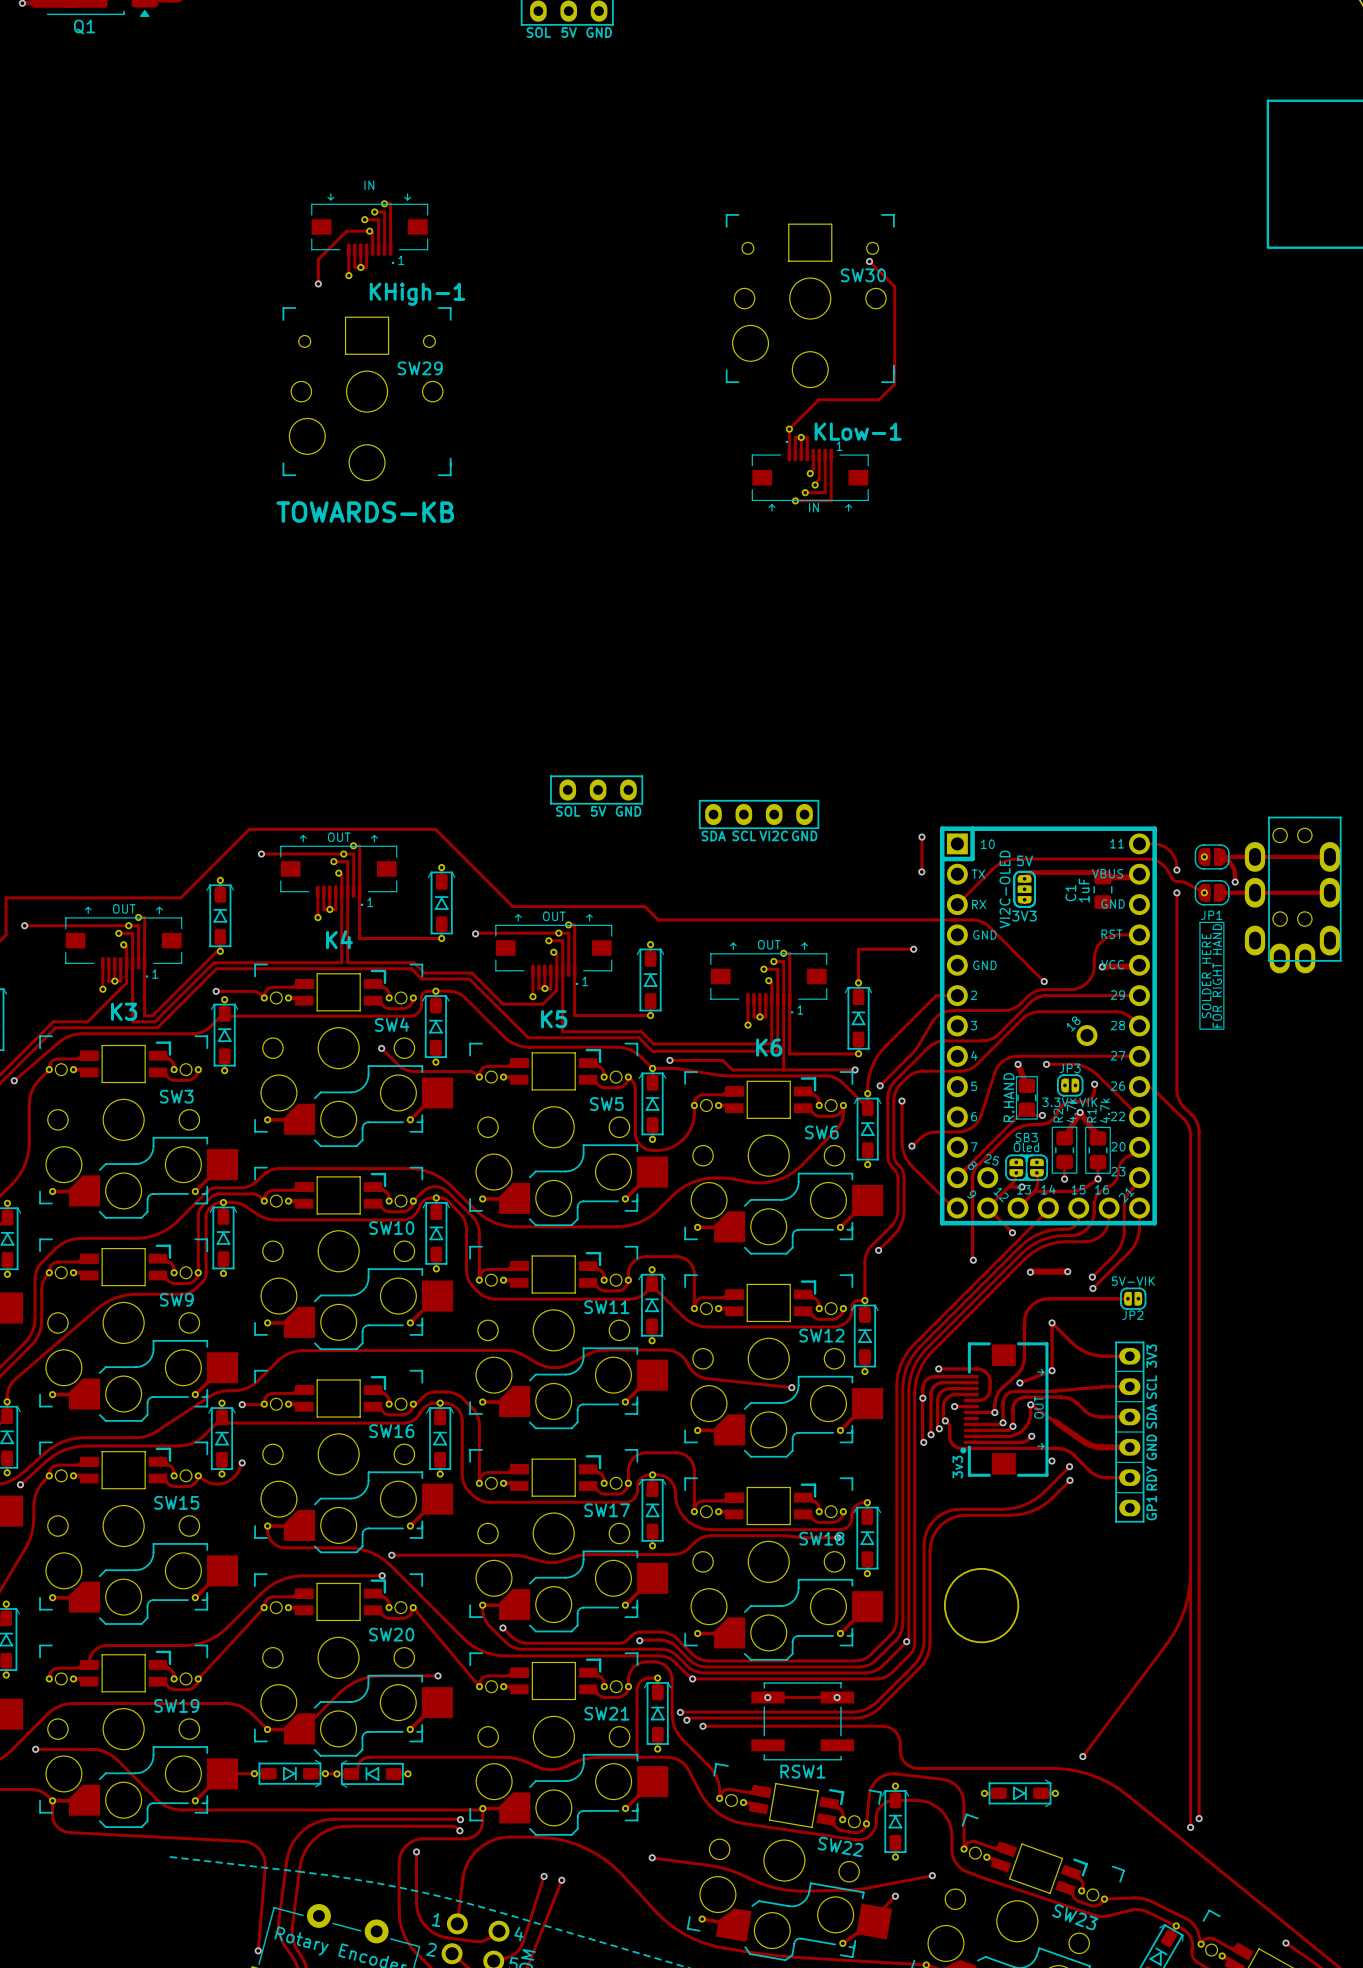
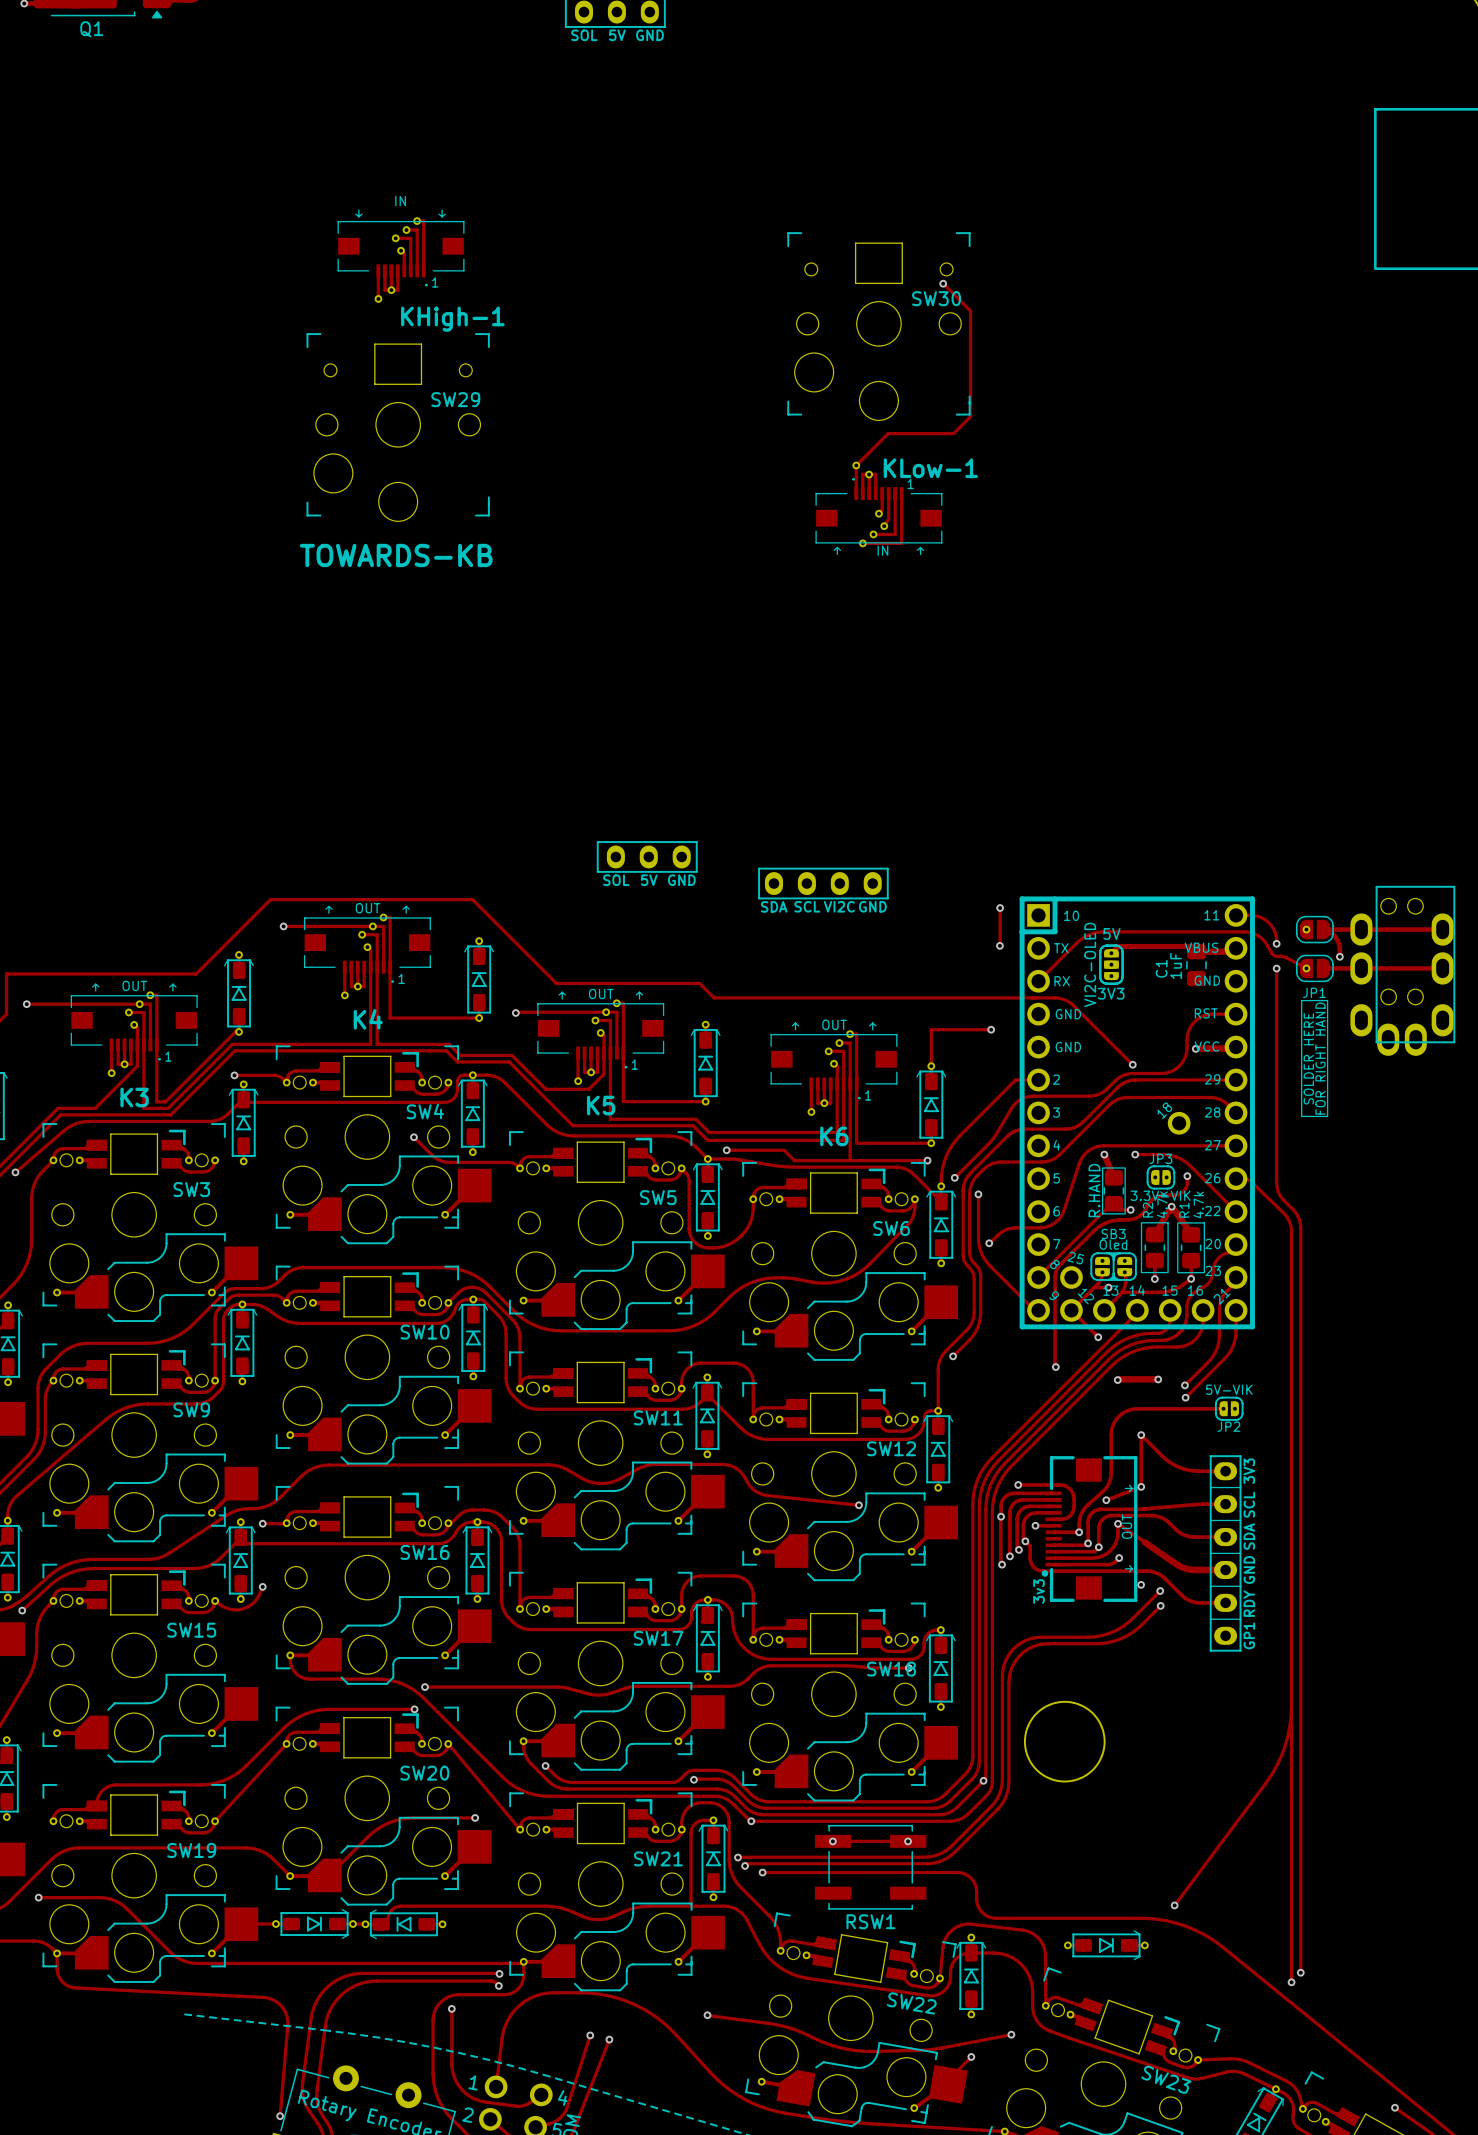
track: (369, 231) (346, 231) (318, 259) (318, 283) -> none
via: (318, 283) -> none

